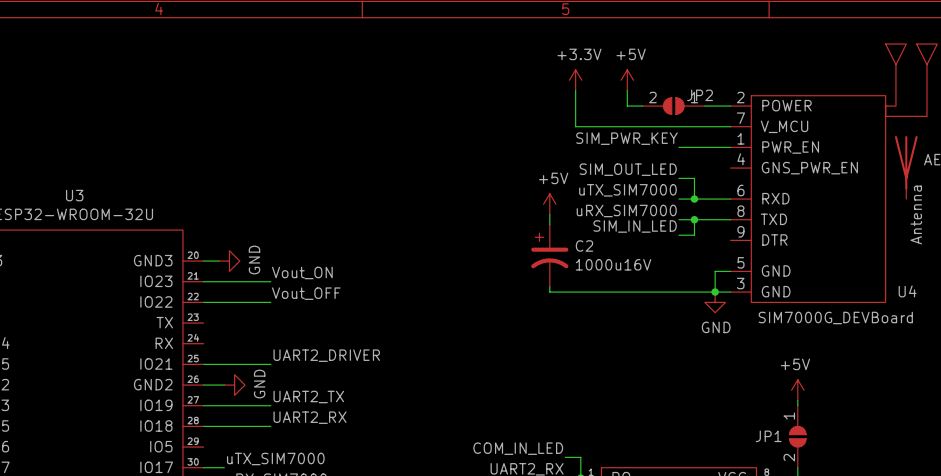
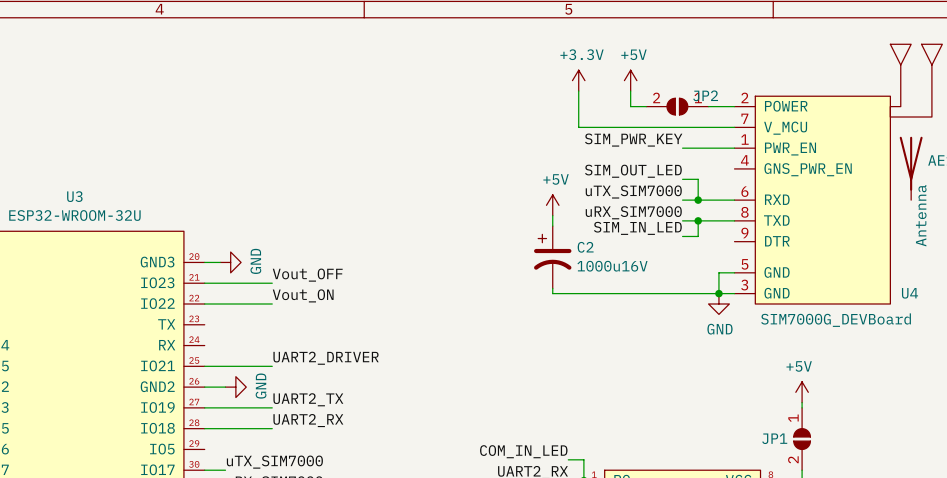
label: Vout_ON (302, 272) -> Vout_OFF (307, 275)
label: Vout_OFF (306, 293) -> Vout_ON (303, 295)

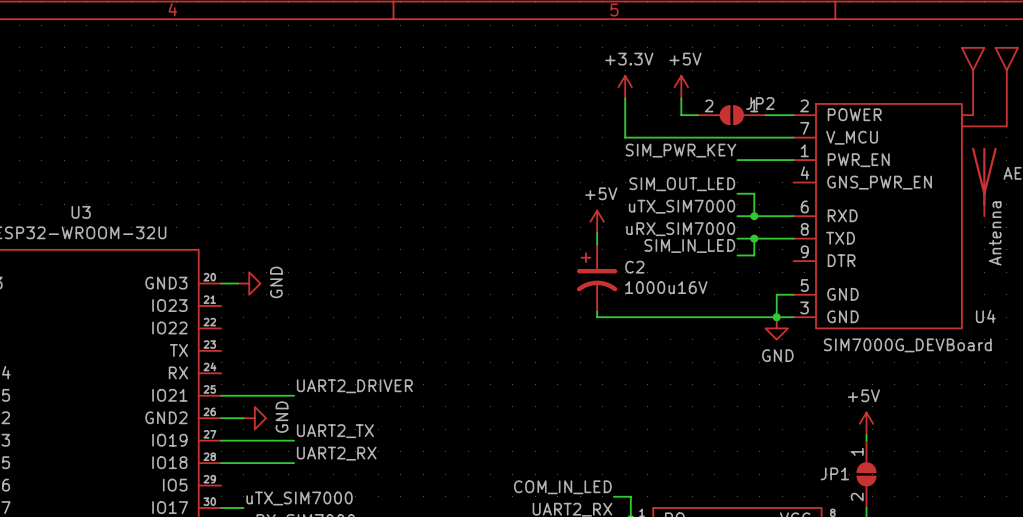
label: Vout_OFF (307, 275) -> none
wire: (204, 283) (272, 283) -> none
label: Vout_ON (303, 295) -> none
wire: (204, 304) (272, 304) -> none

